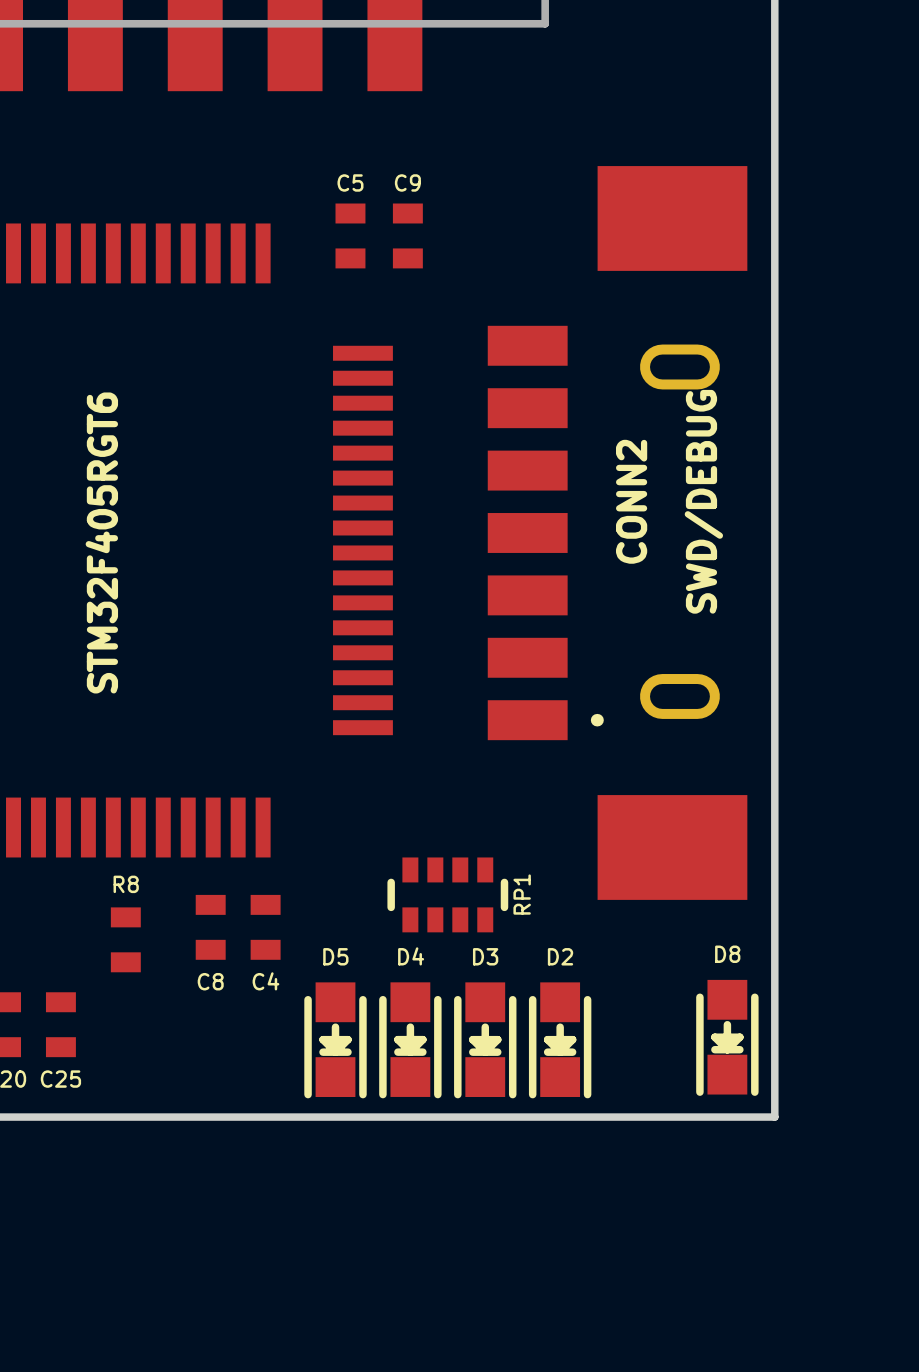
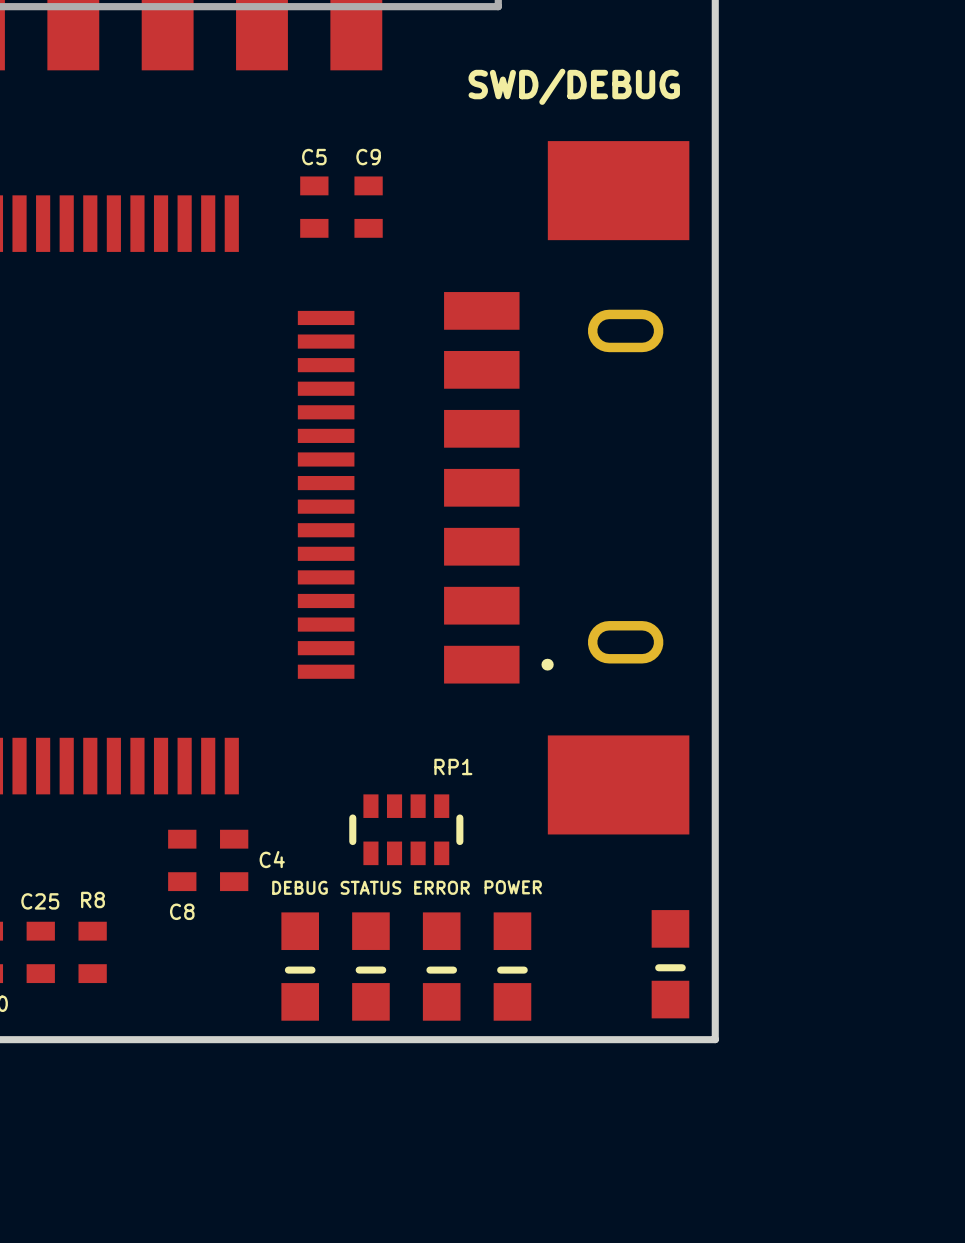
CONN2 name: CONN2 (631, 501) -> none
CONN2 value rotation: 0° (703, 501) -> 90° clockwise (574, 86)
CONN2 value position: SWD/DEBUG (703, 501) -> SWD/DEBUG (574, 86)
part value: STM32F405RGT6 (101, 542) -> none
RP1 name rotation: 0° (522, 894) -> 90° clockwise (453, 766)
RP1 name position: RP1 (522, 894) -> RP1 (453, 766)
R8 position: (125, 939) -> (92, 952)
C4 name position: C4 (265, 981) -> C4 (272, 859)
D8: (727, 1037) -> none
part: none -> (670, 964)
part: none -> DEBUG (300, 966)
part: none -> STATUS (370, 966)
part: none -> ERROR (441, 966)
part: none -> POWER (512, 966)
D5: (335, 1040) -> none
D4: (410, 1040) -> none
D3: (485, 1040) -> none
D2: (560, 1040) -> none
C25 name position: C25 (60, 1079) -> C25 (40, 901)

